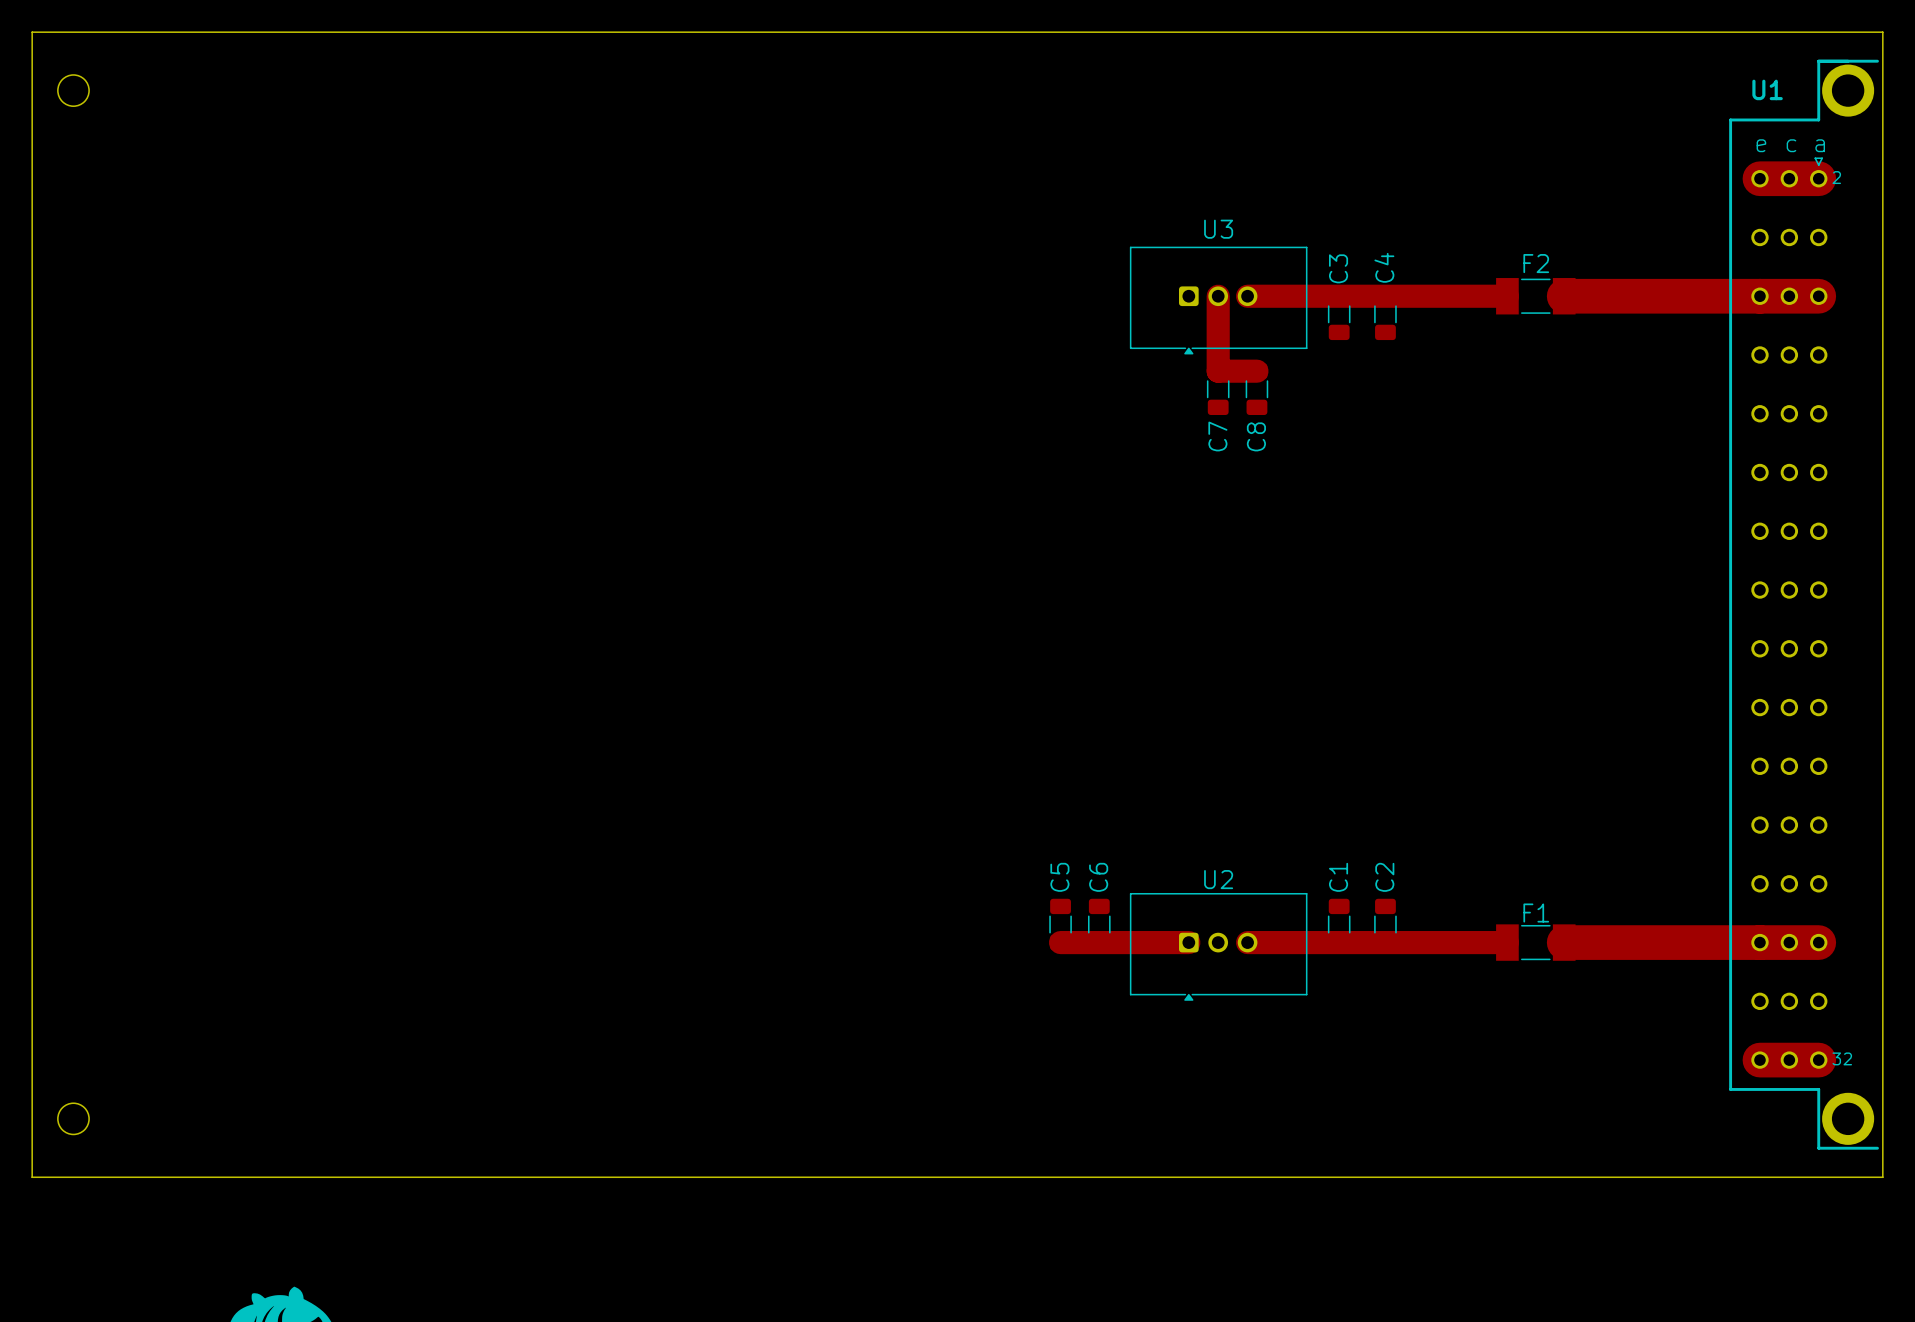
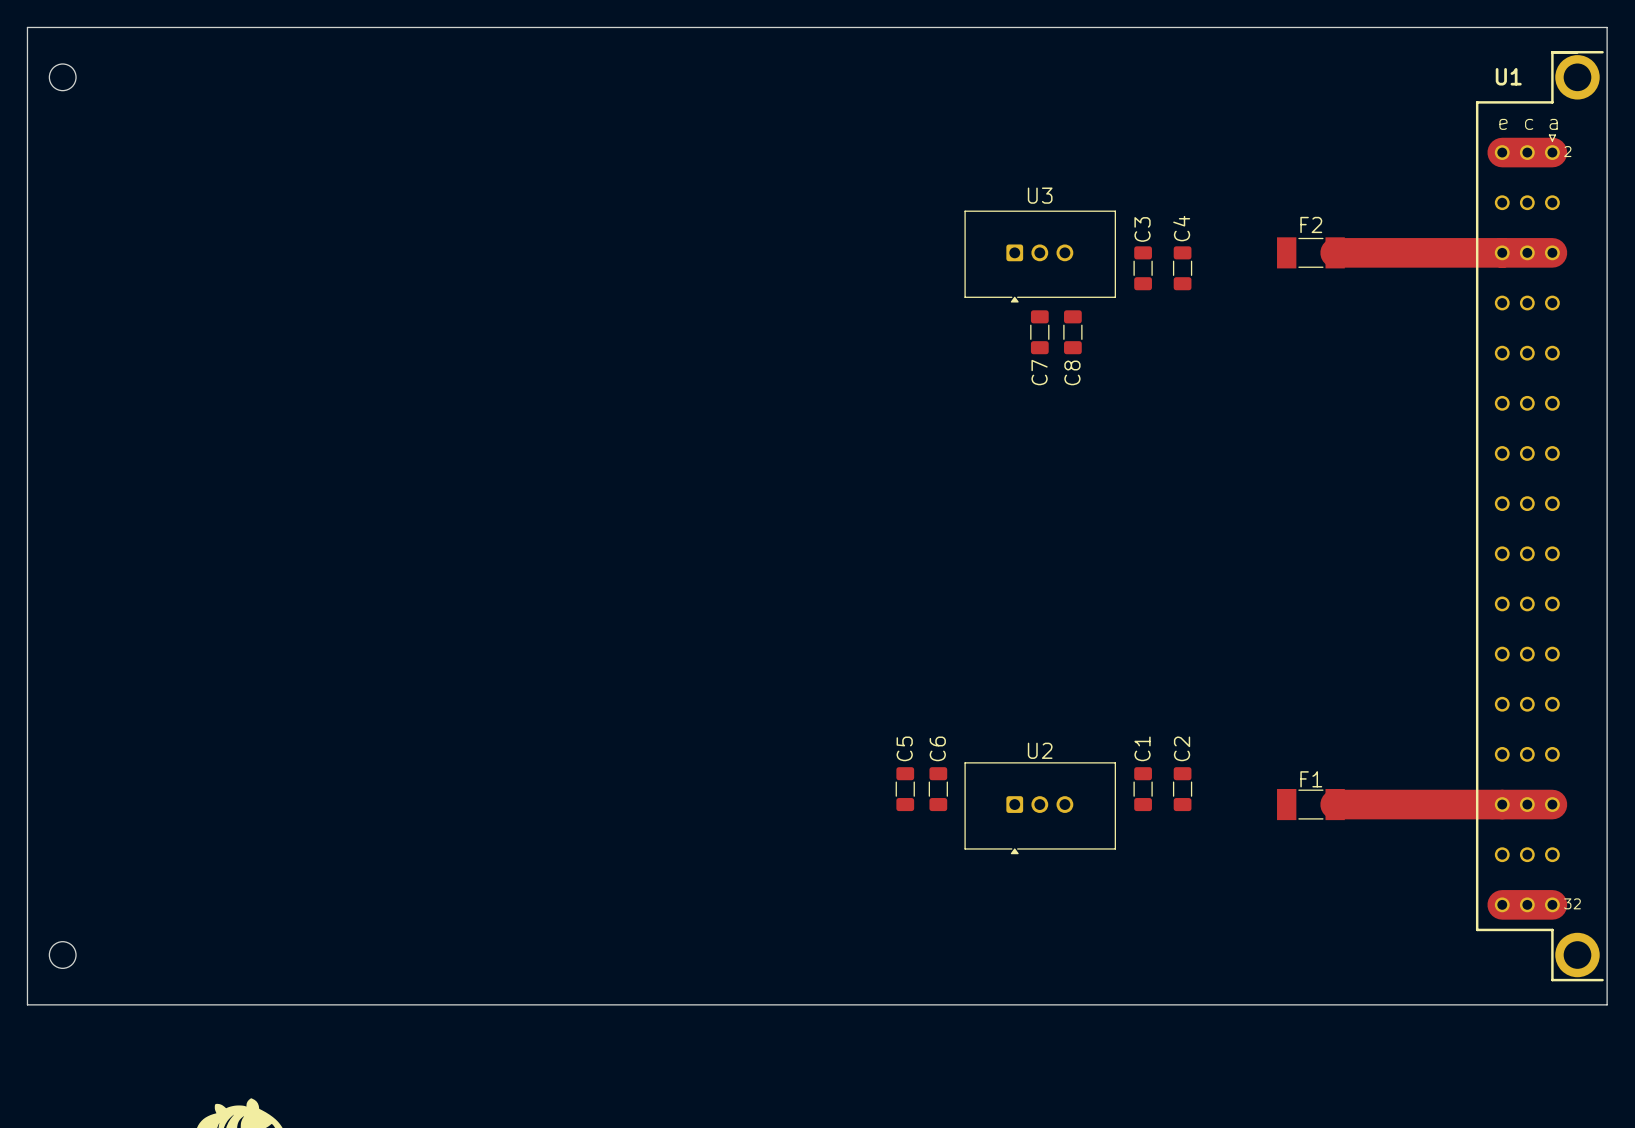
track: (1218, 296) (1218, 371) (1256, 371) -> none
track: (1247, 296) (1507, 296) -> none
track: (1060, 942) (1188, 942) -> none
track: (1247, 942) (1507, 942) -> none

